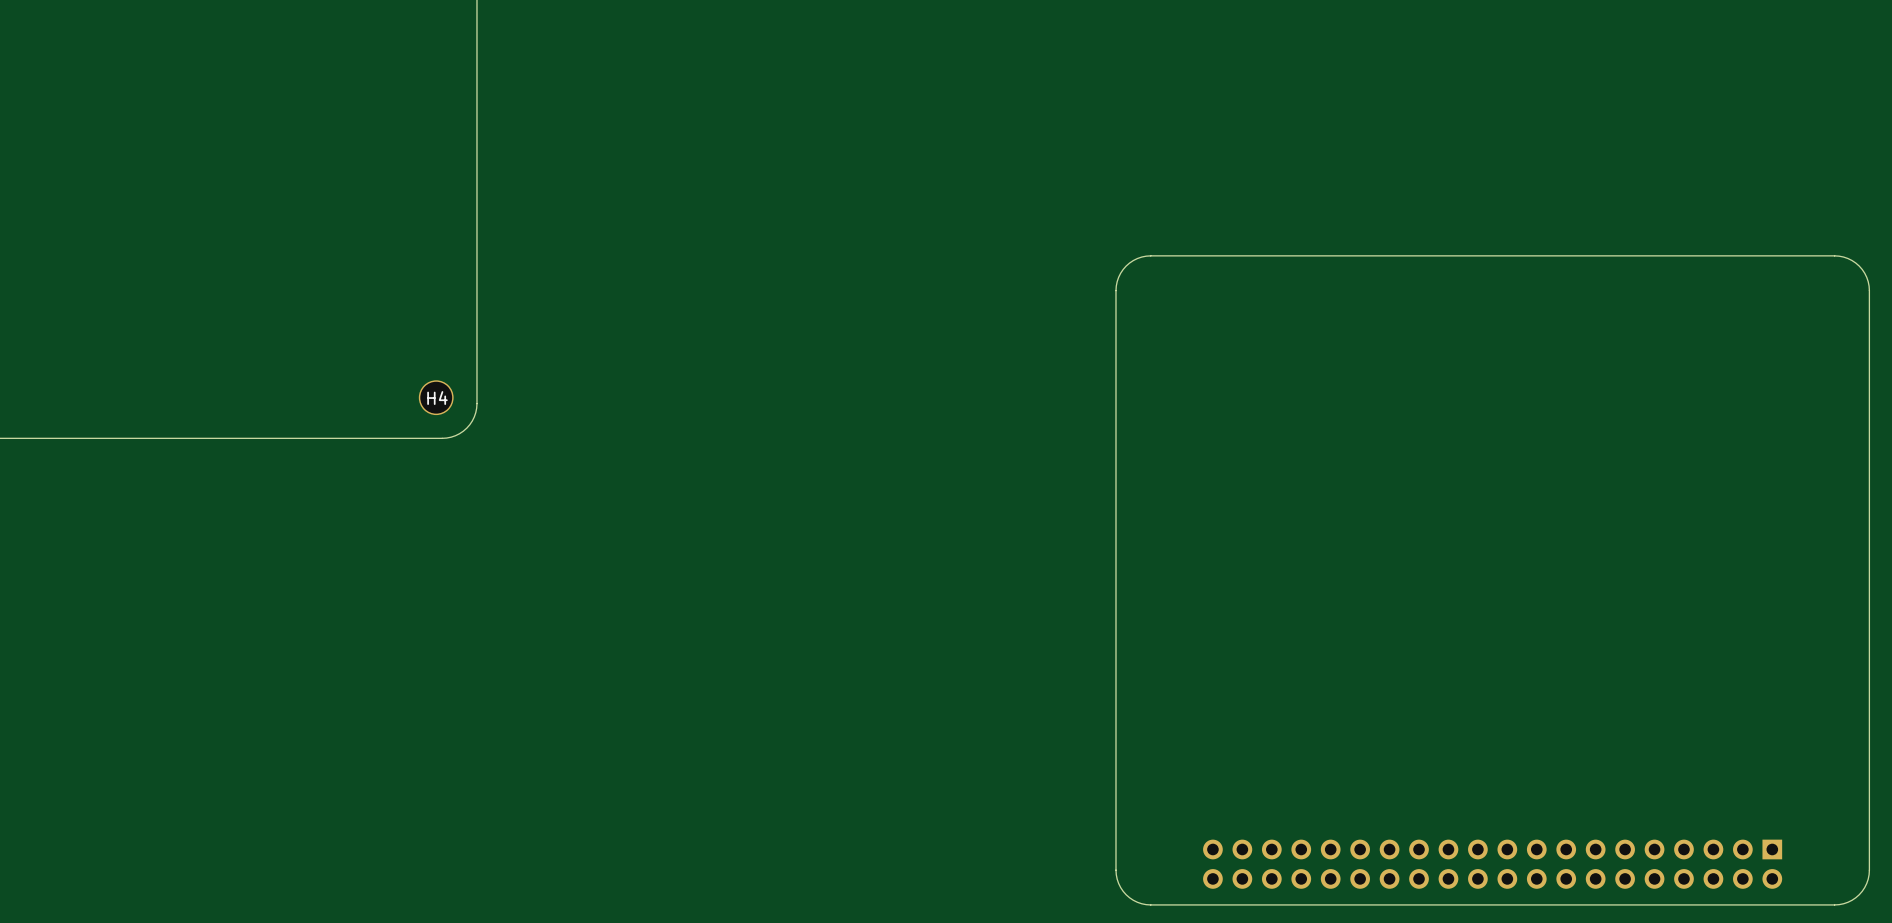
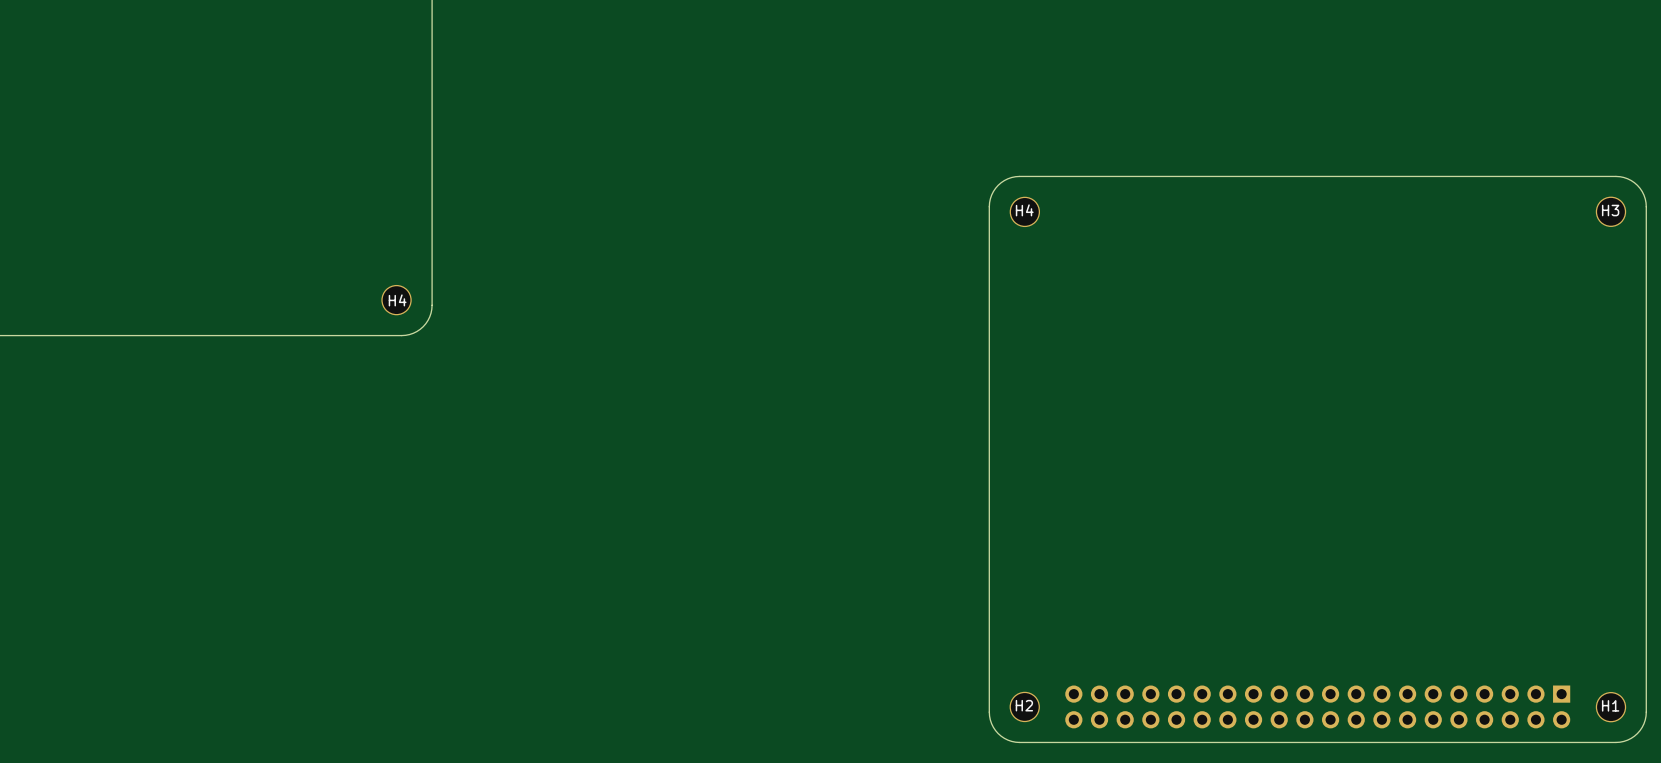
H4: none -> (1024, 211)
H3: none -> (1610, 211)
H2: none -> (1024, 706)
H1: none -> (1610, 707)

